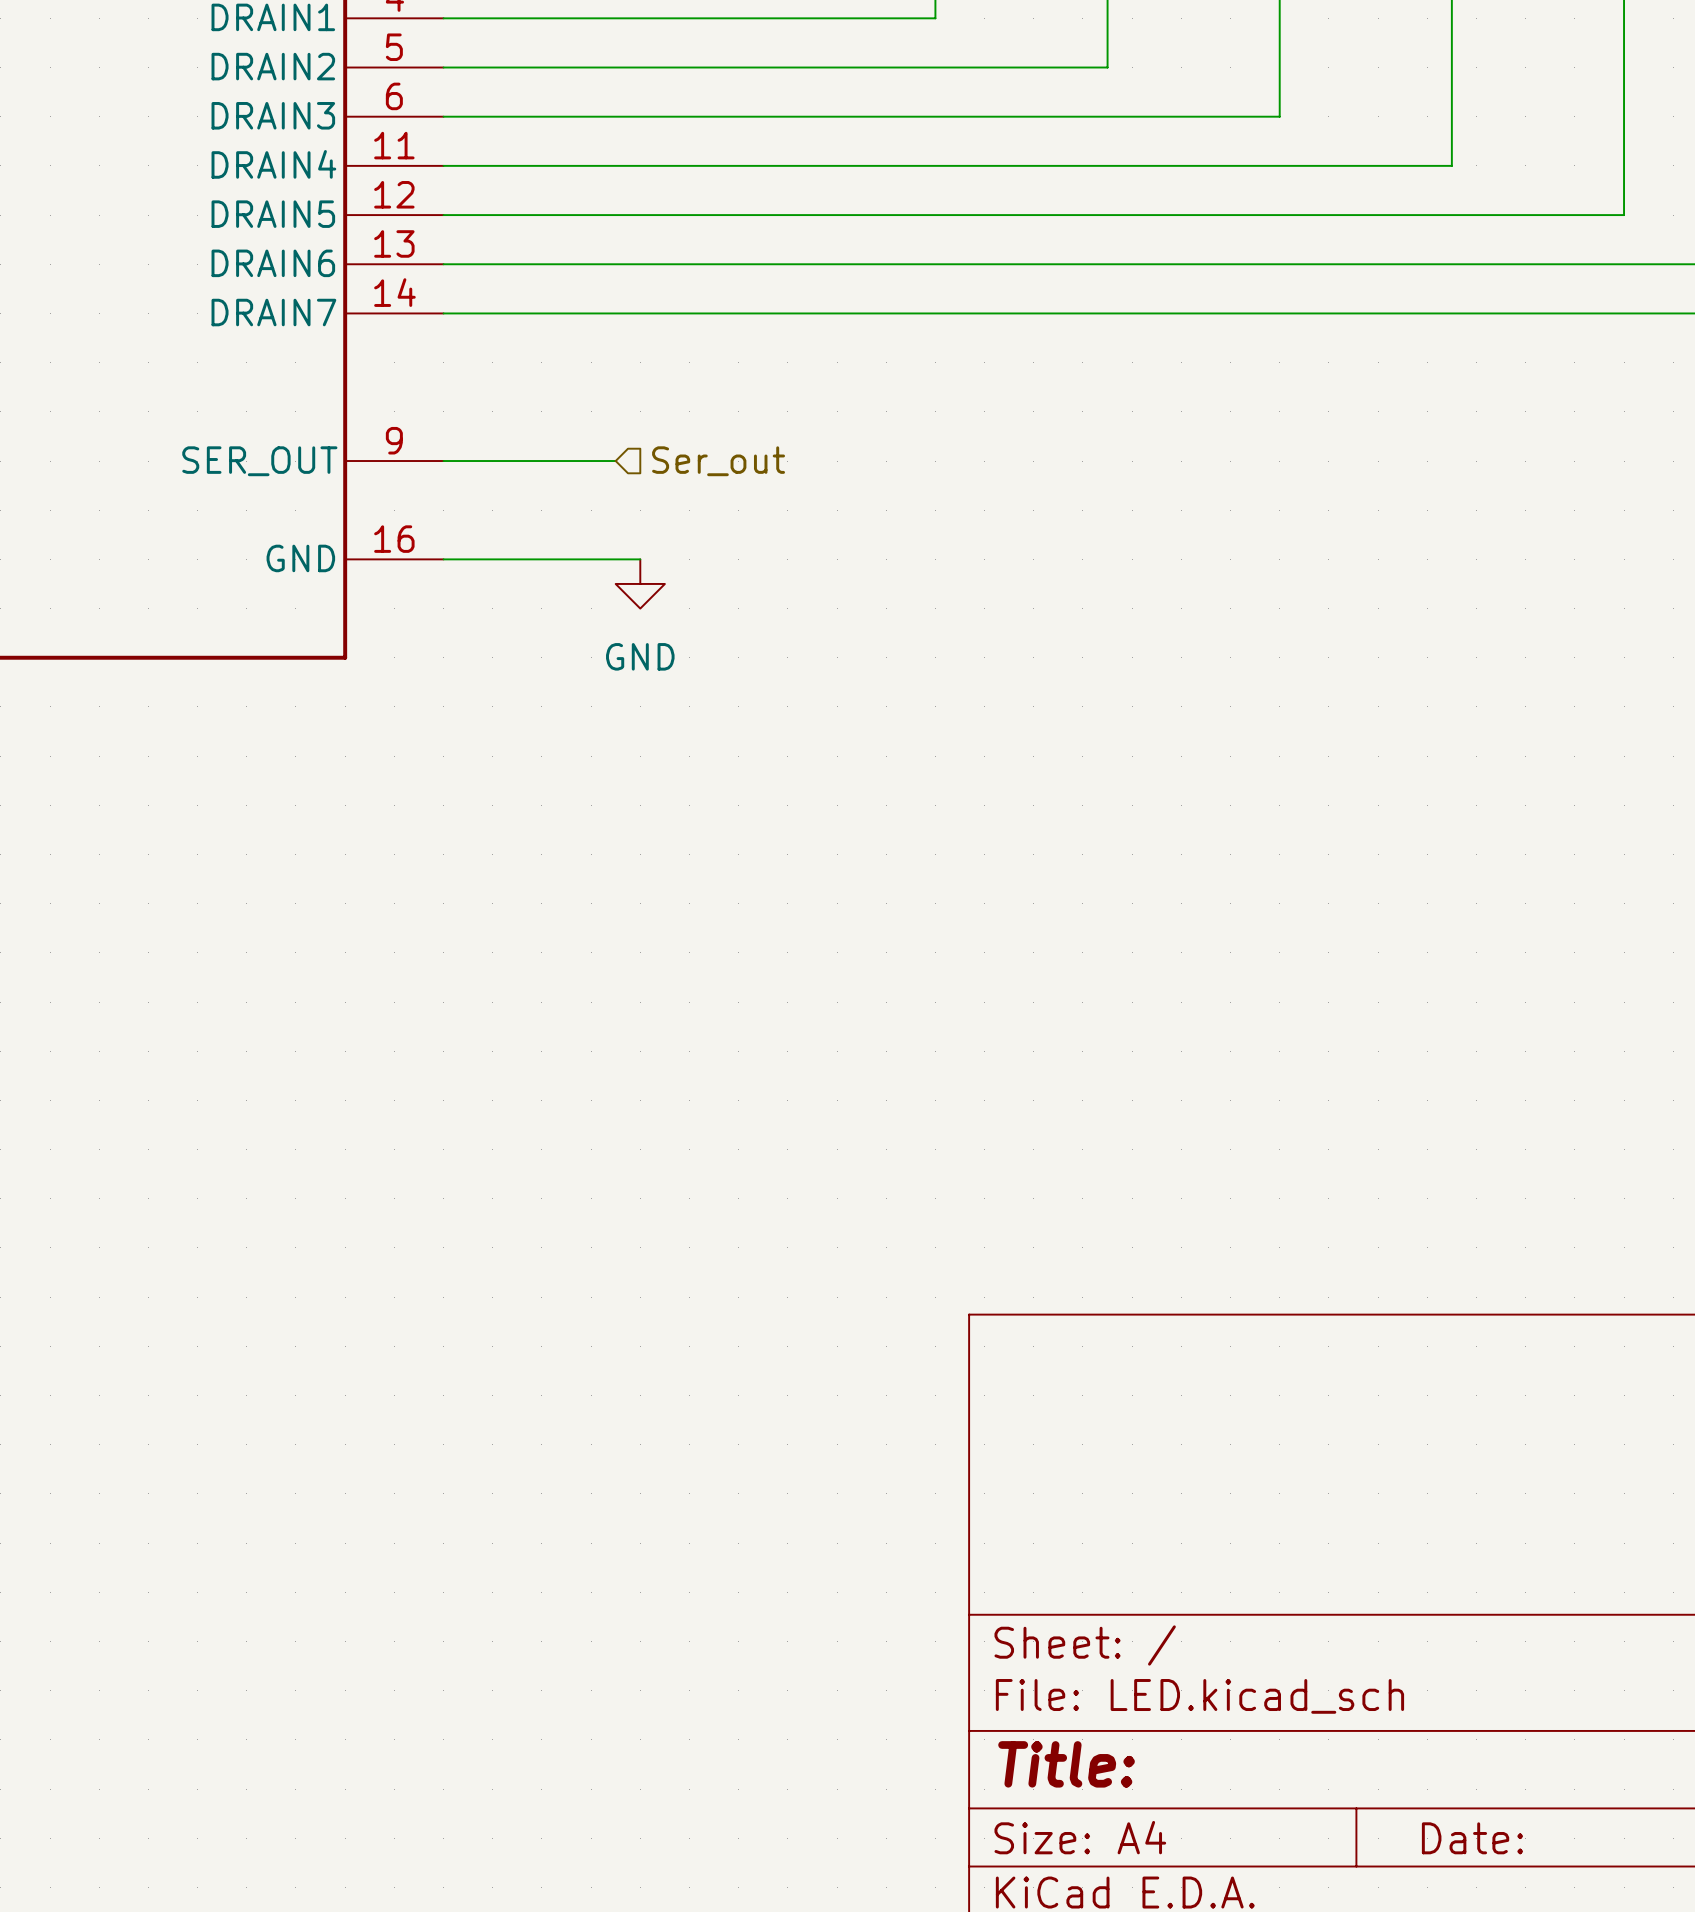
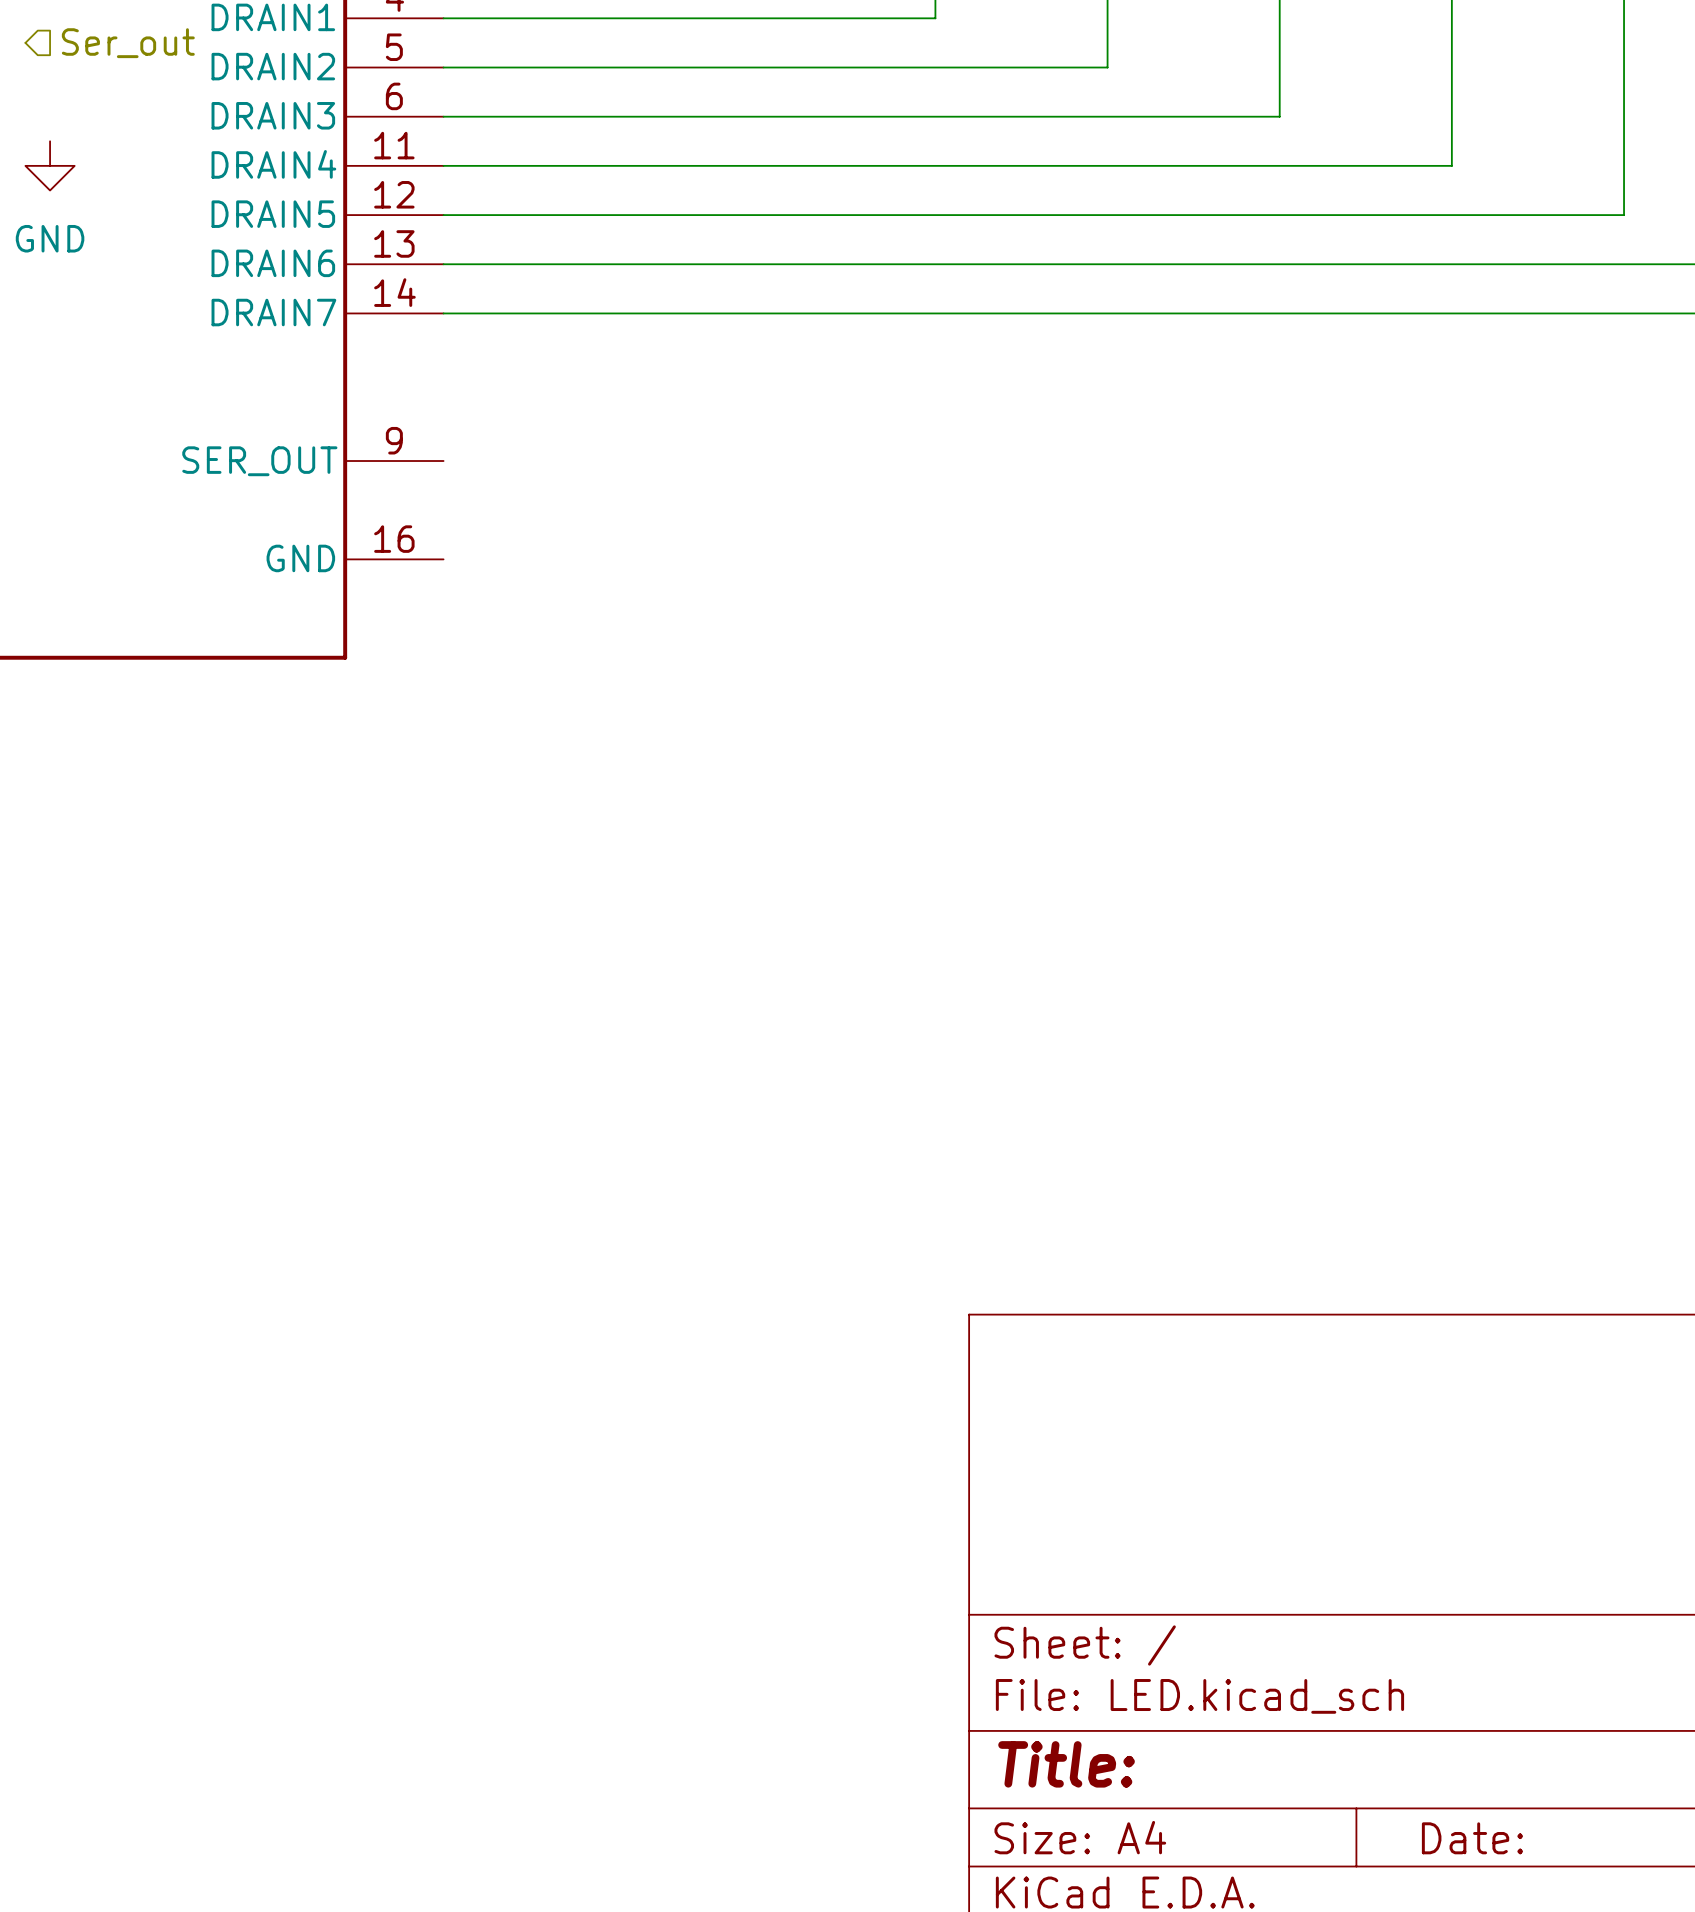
hierarchical label: none -> Ser_out (128, 43)
power symbol: none -> GND (50, 165)
wire: (443, 461) (615, 461) -> none
hierarchical label: Ser_out (718, 461) -> none
wire: (443, 559) (640, 559) -> none
power symbol: GND (640, 583) -> none

